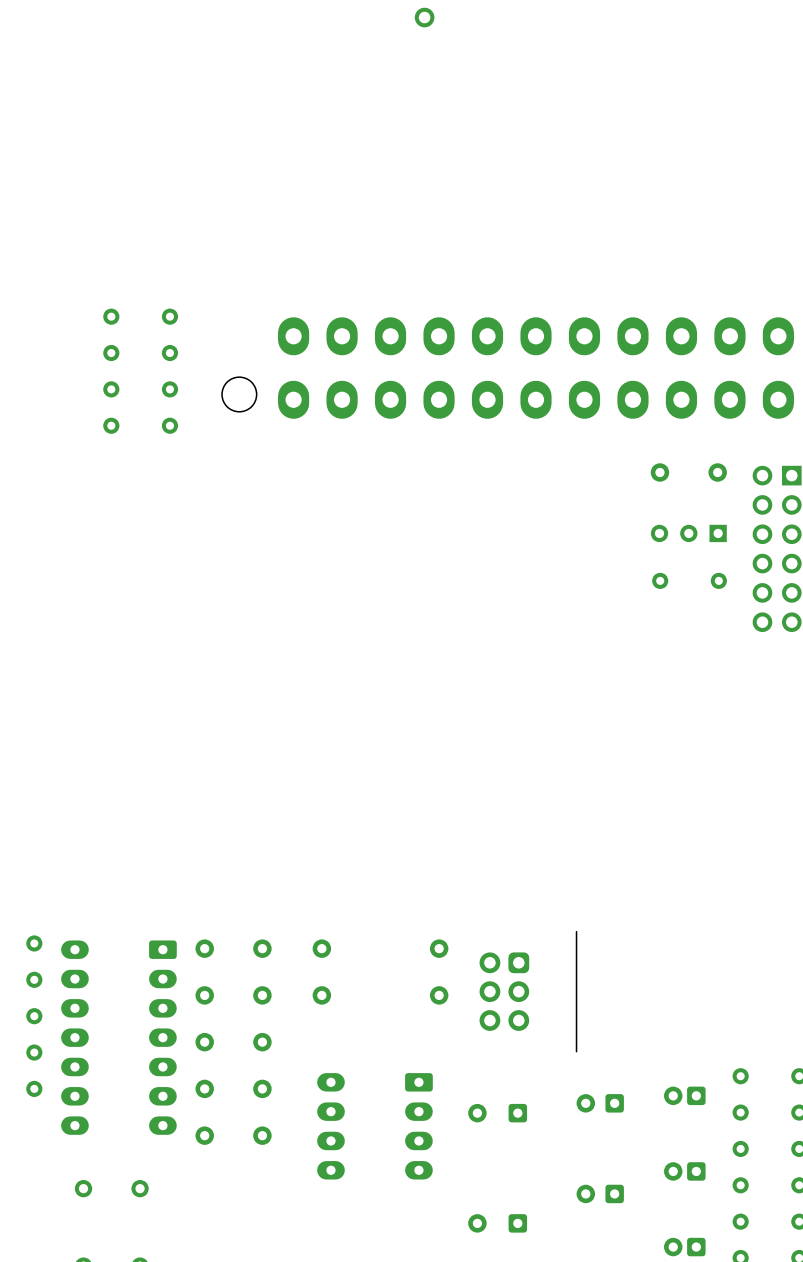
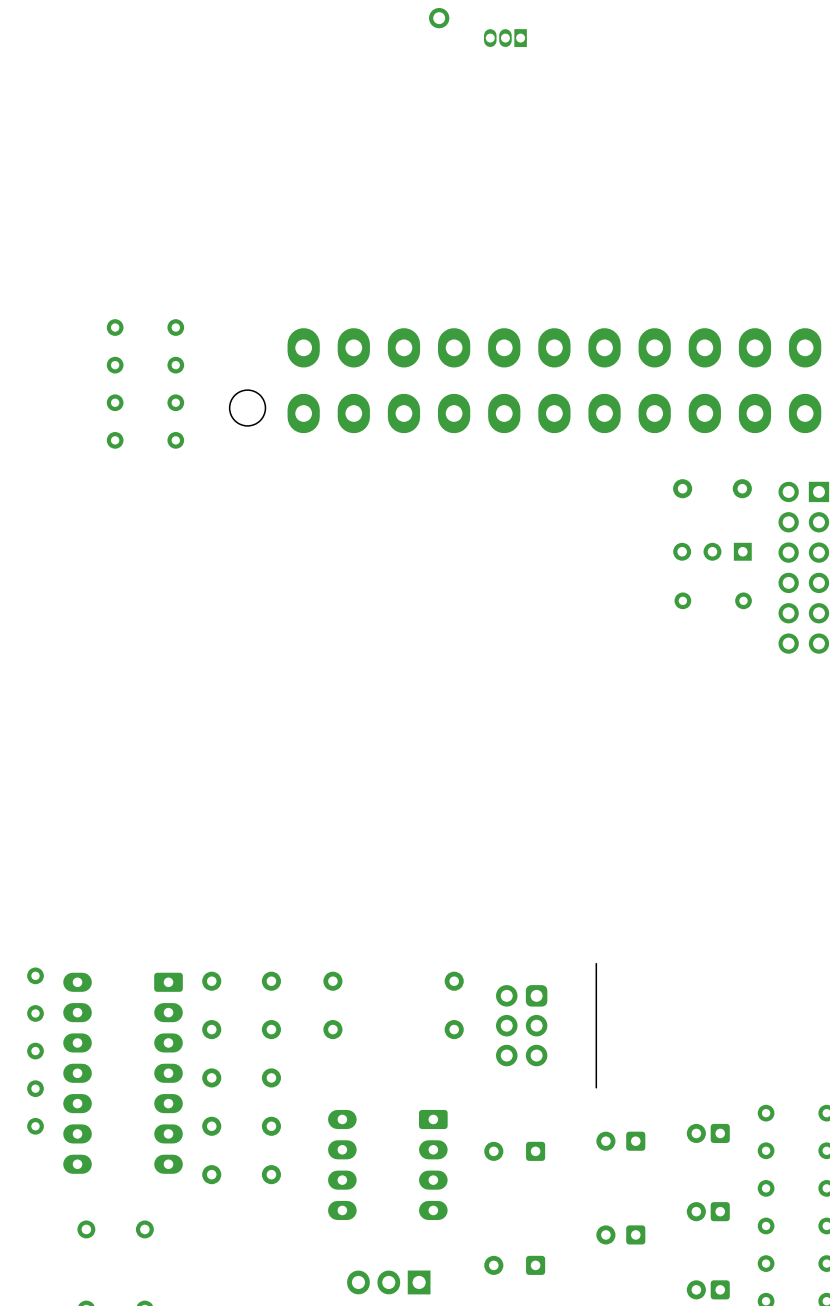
part: none -> (505, 38)
part: none -> (388, 1282)

